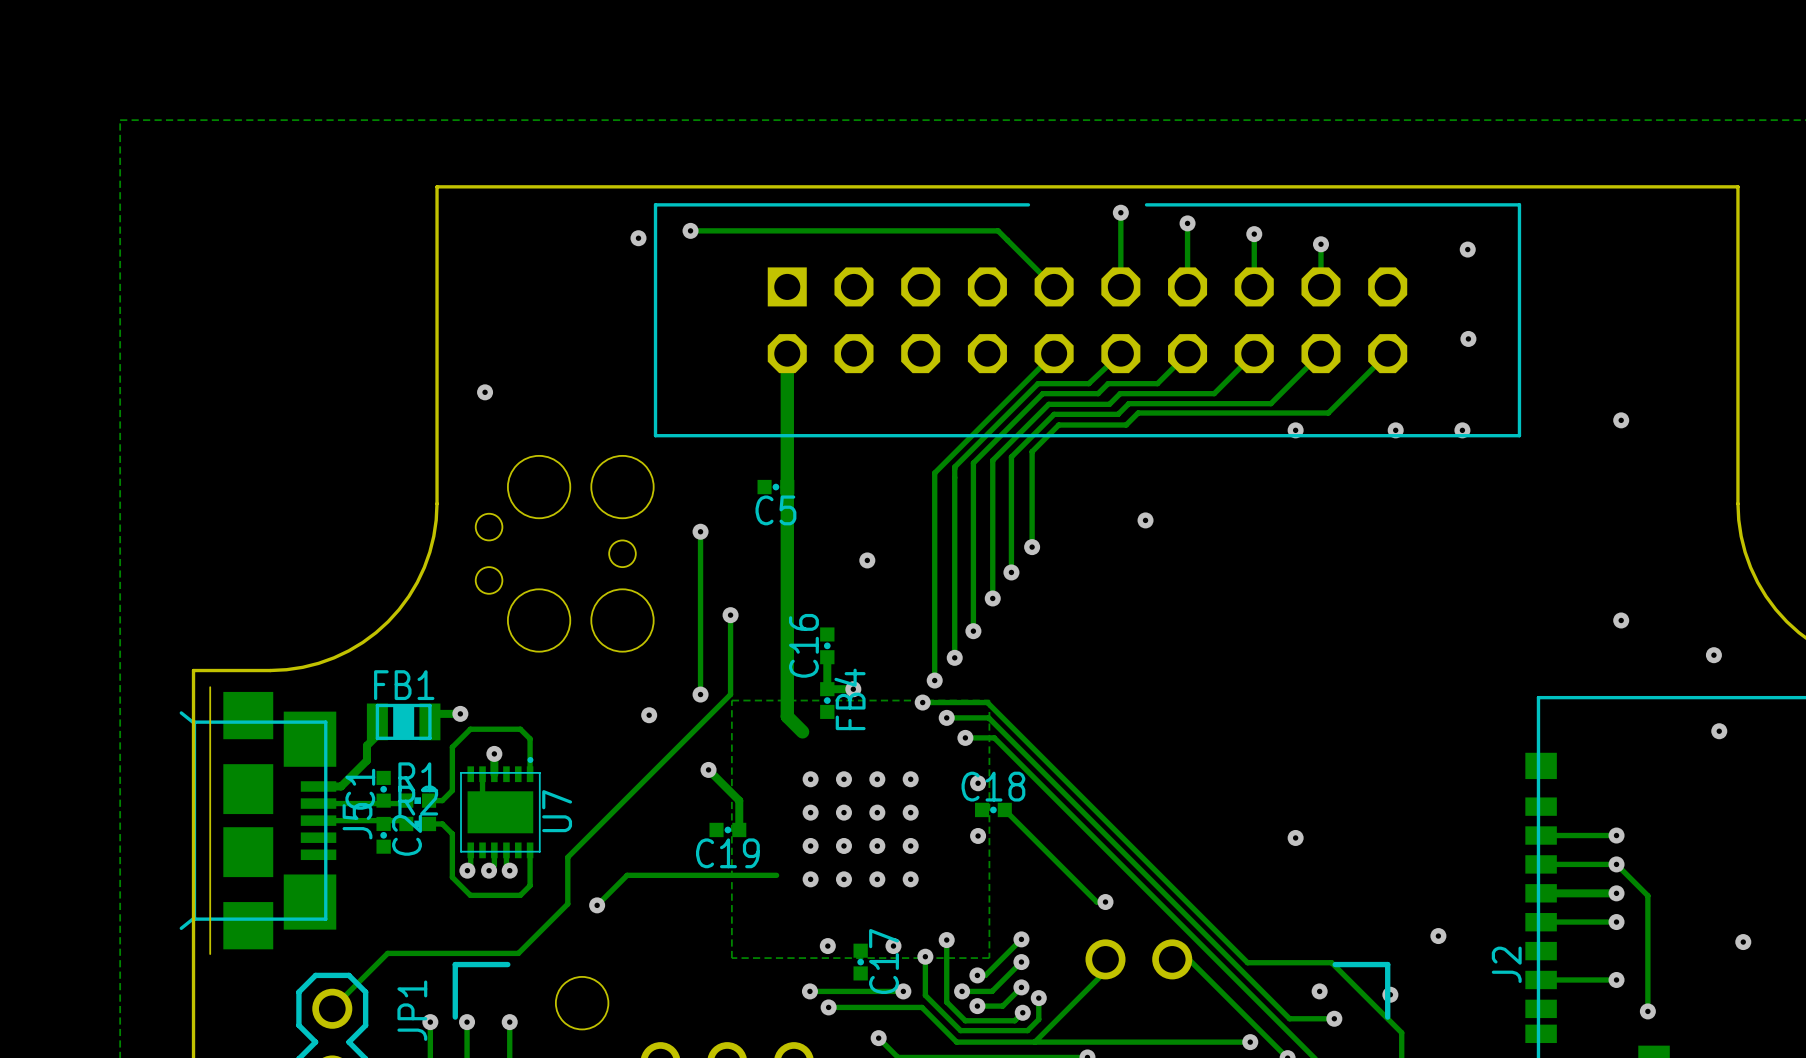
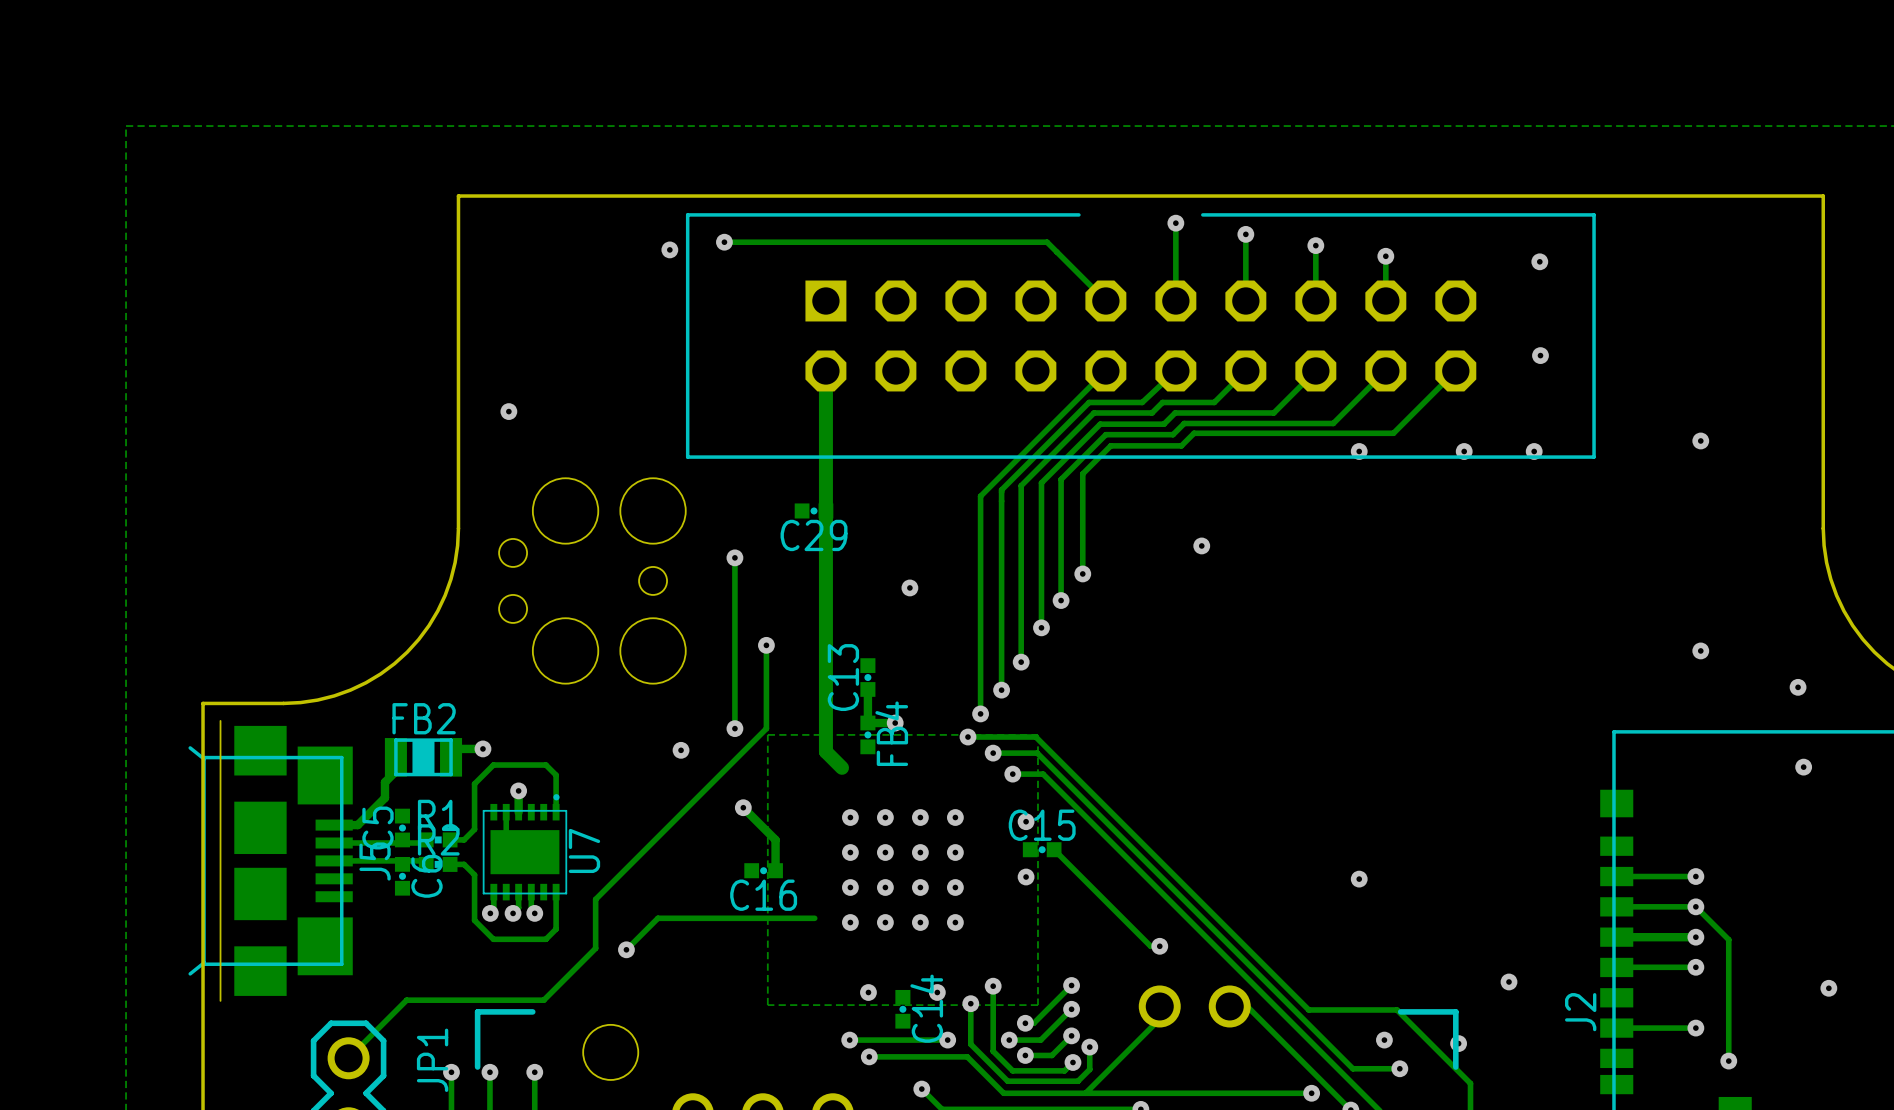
C5 name: C5 (775, 510) -> C29 (814, 535)
C16 name: C16 (803, 645) -> C13 (843, 677)
FB1 name: FB1 (404, 685) -> FB2 (424, 718)
C18 name: C18 (993, 786) -> C15 (1042, 825)
C1 name: C1 (360, 789) -> C5 (377, 828)
C2 name: C2 (407, 835) -> C6 (426, 876)
C19 name: C19 (727, 853) -> C16 (763, 895)
C17 name: C17 (884, 961) -> C14 (926, 1008)

